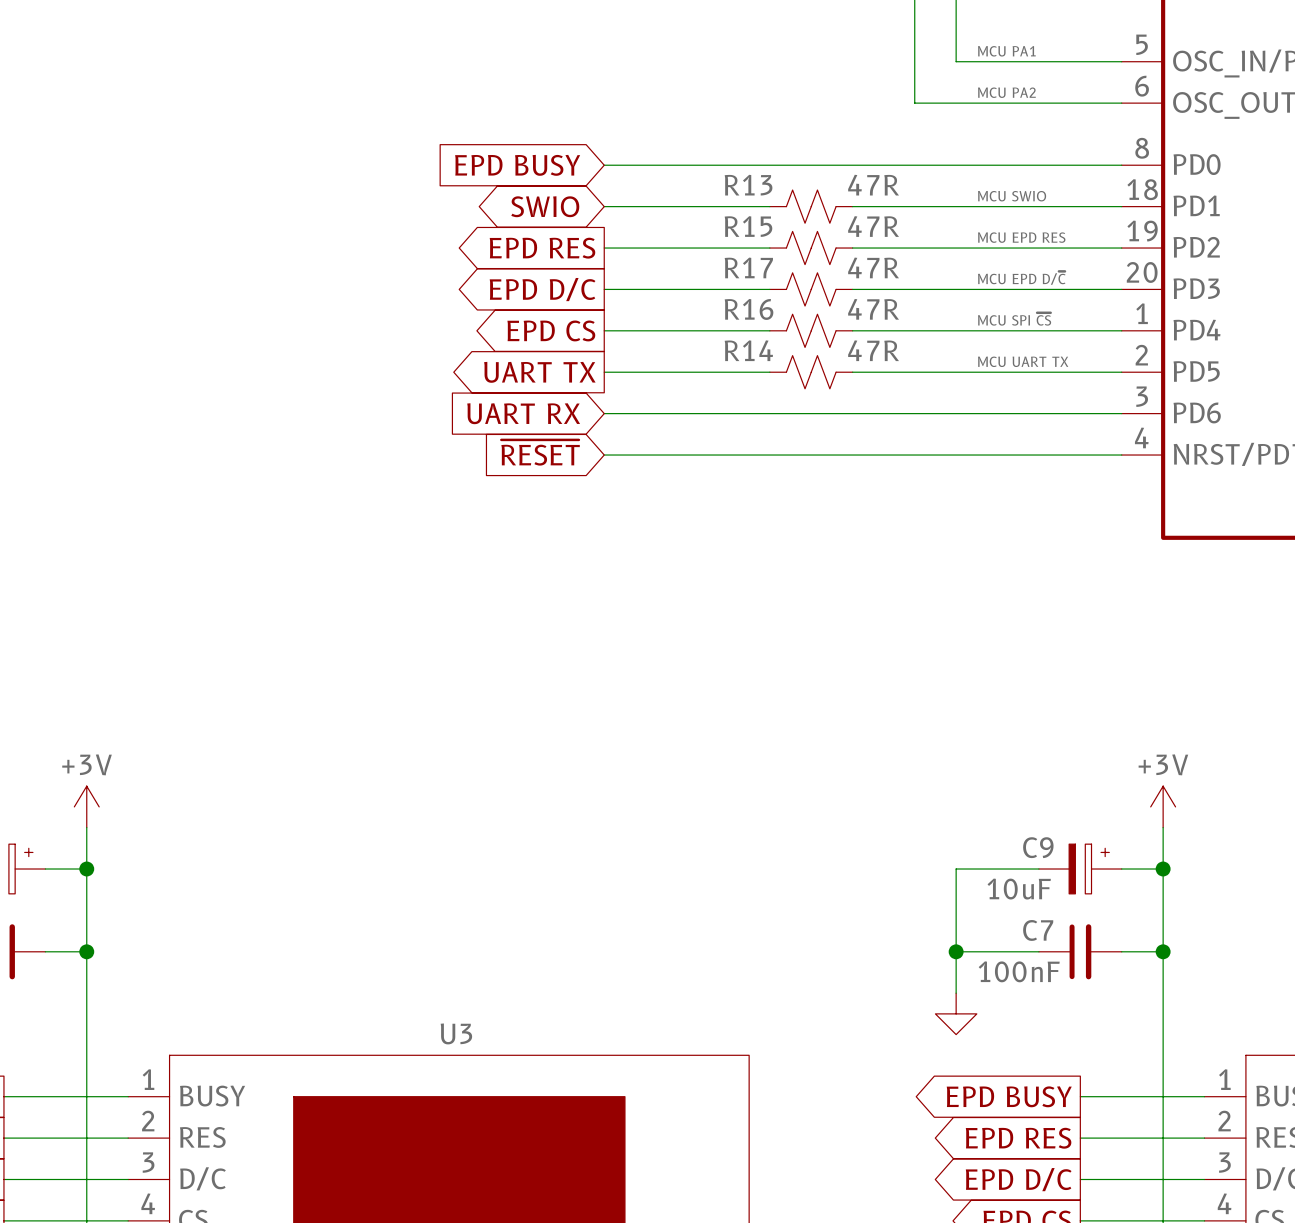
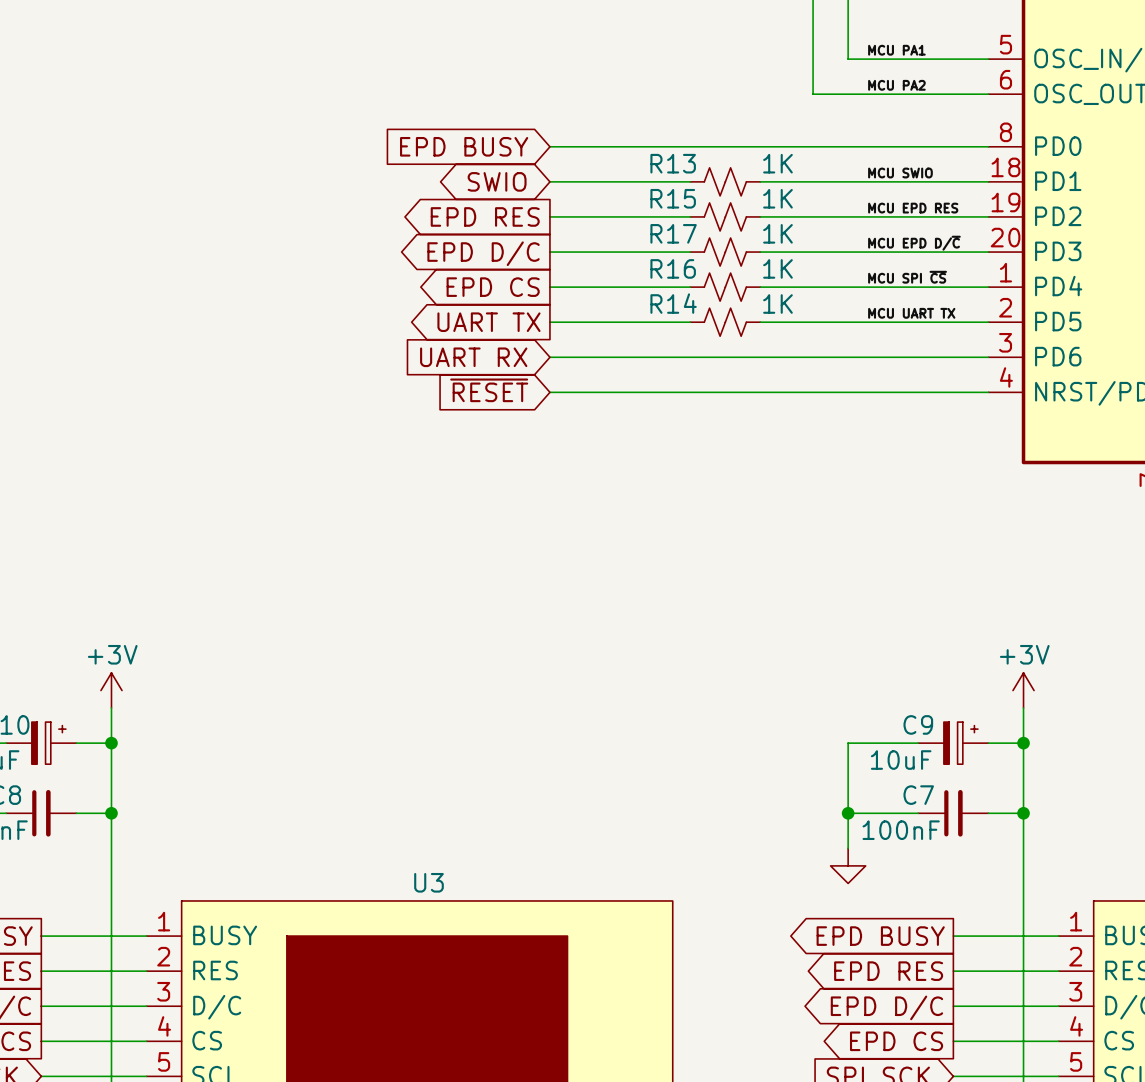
R13 value: 47R (873, 185) -> 1K (777, 163)
R15 value: 47R (873, 226) -> 1K (777, 198)
R17 value: 47R (873, 267) -> 1K (777, 233)
R16 value: 47R (873, 309) -> 1K (777, 268)
R14 value: 47R (873, 350) -> 1K (777, 304)

